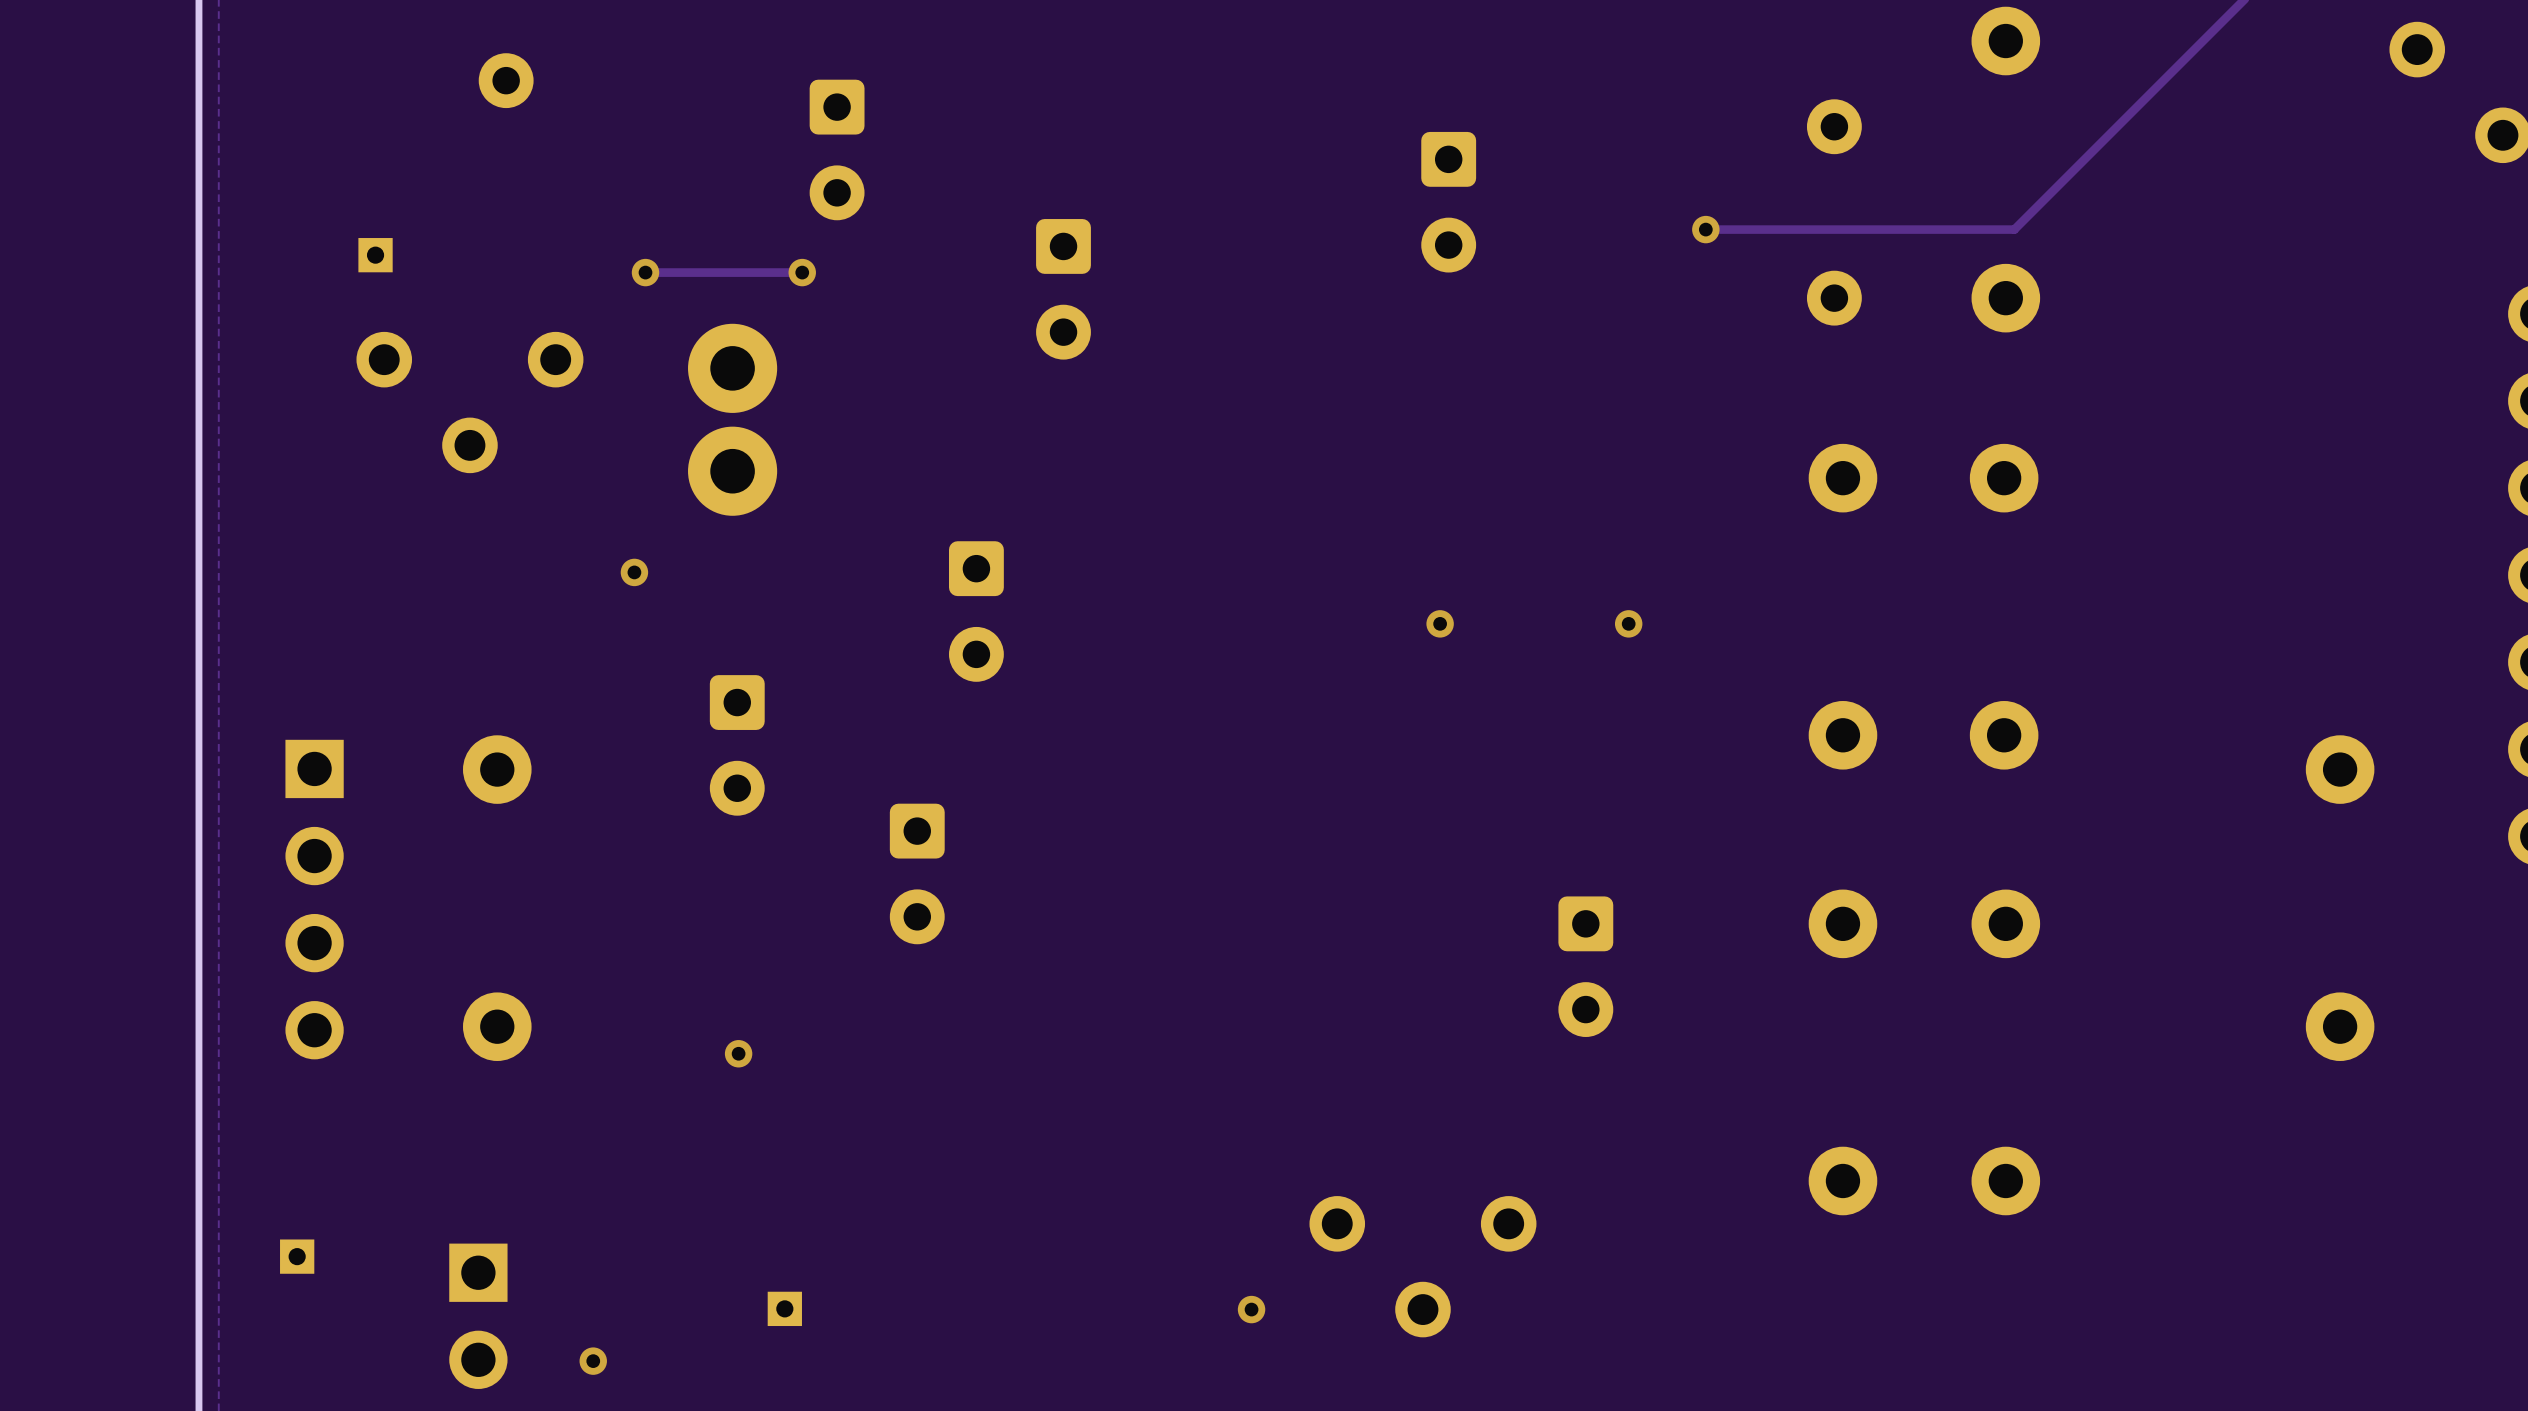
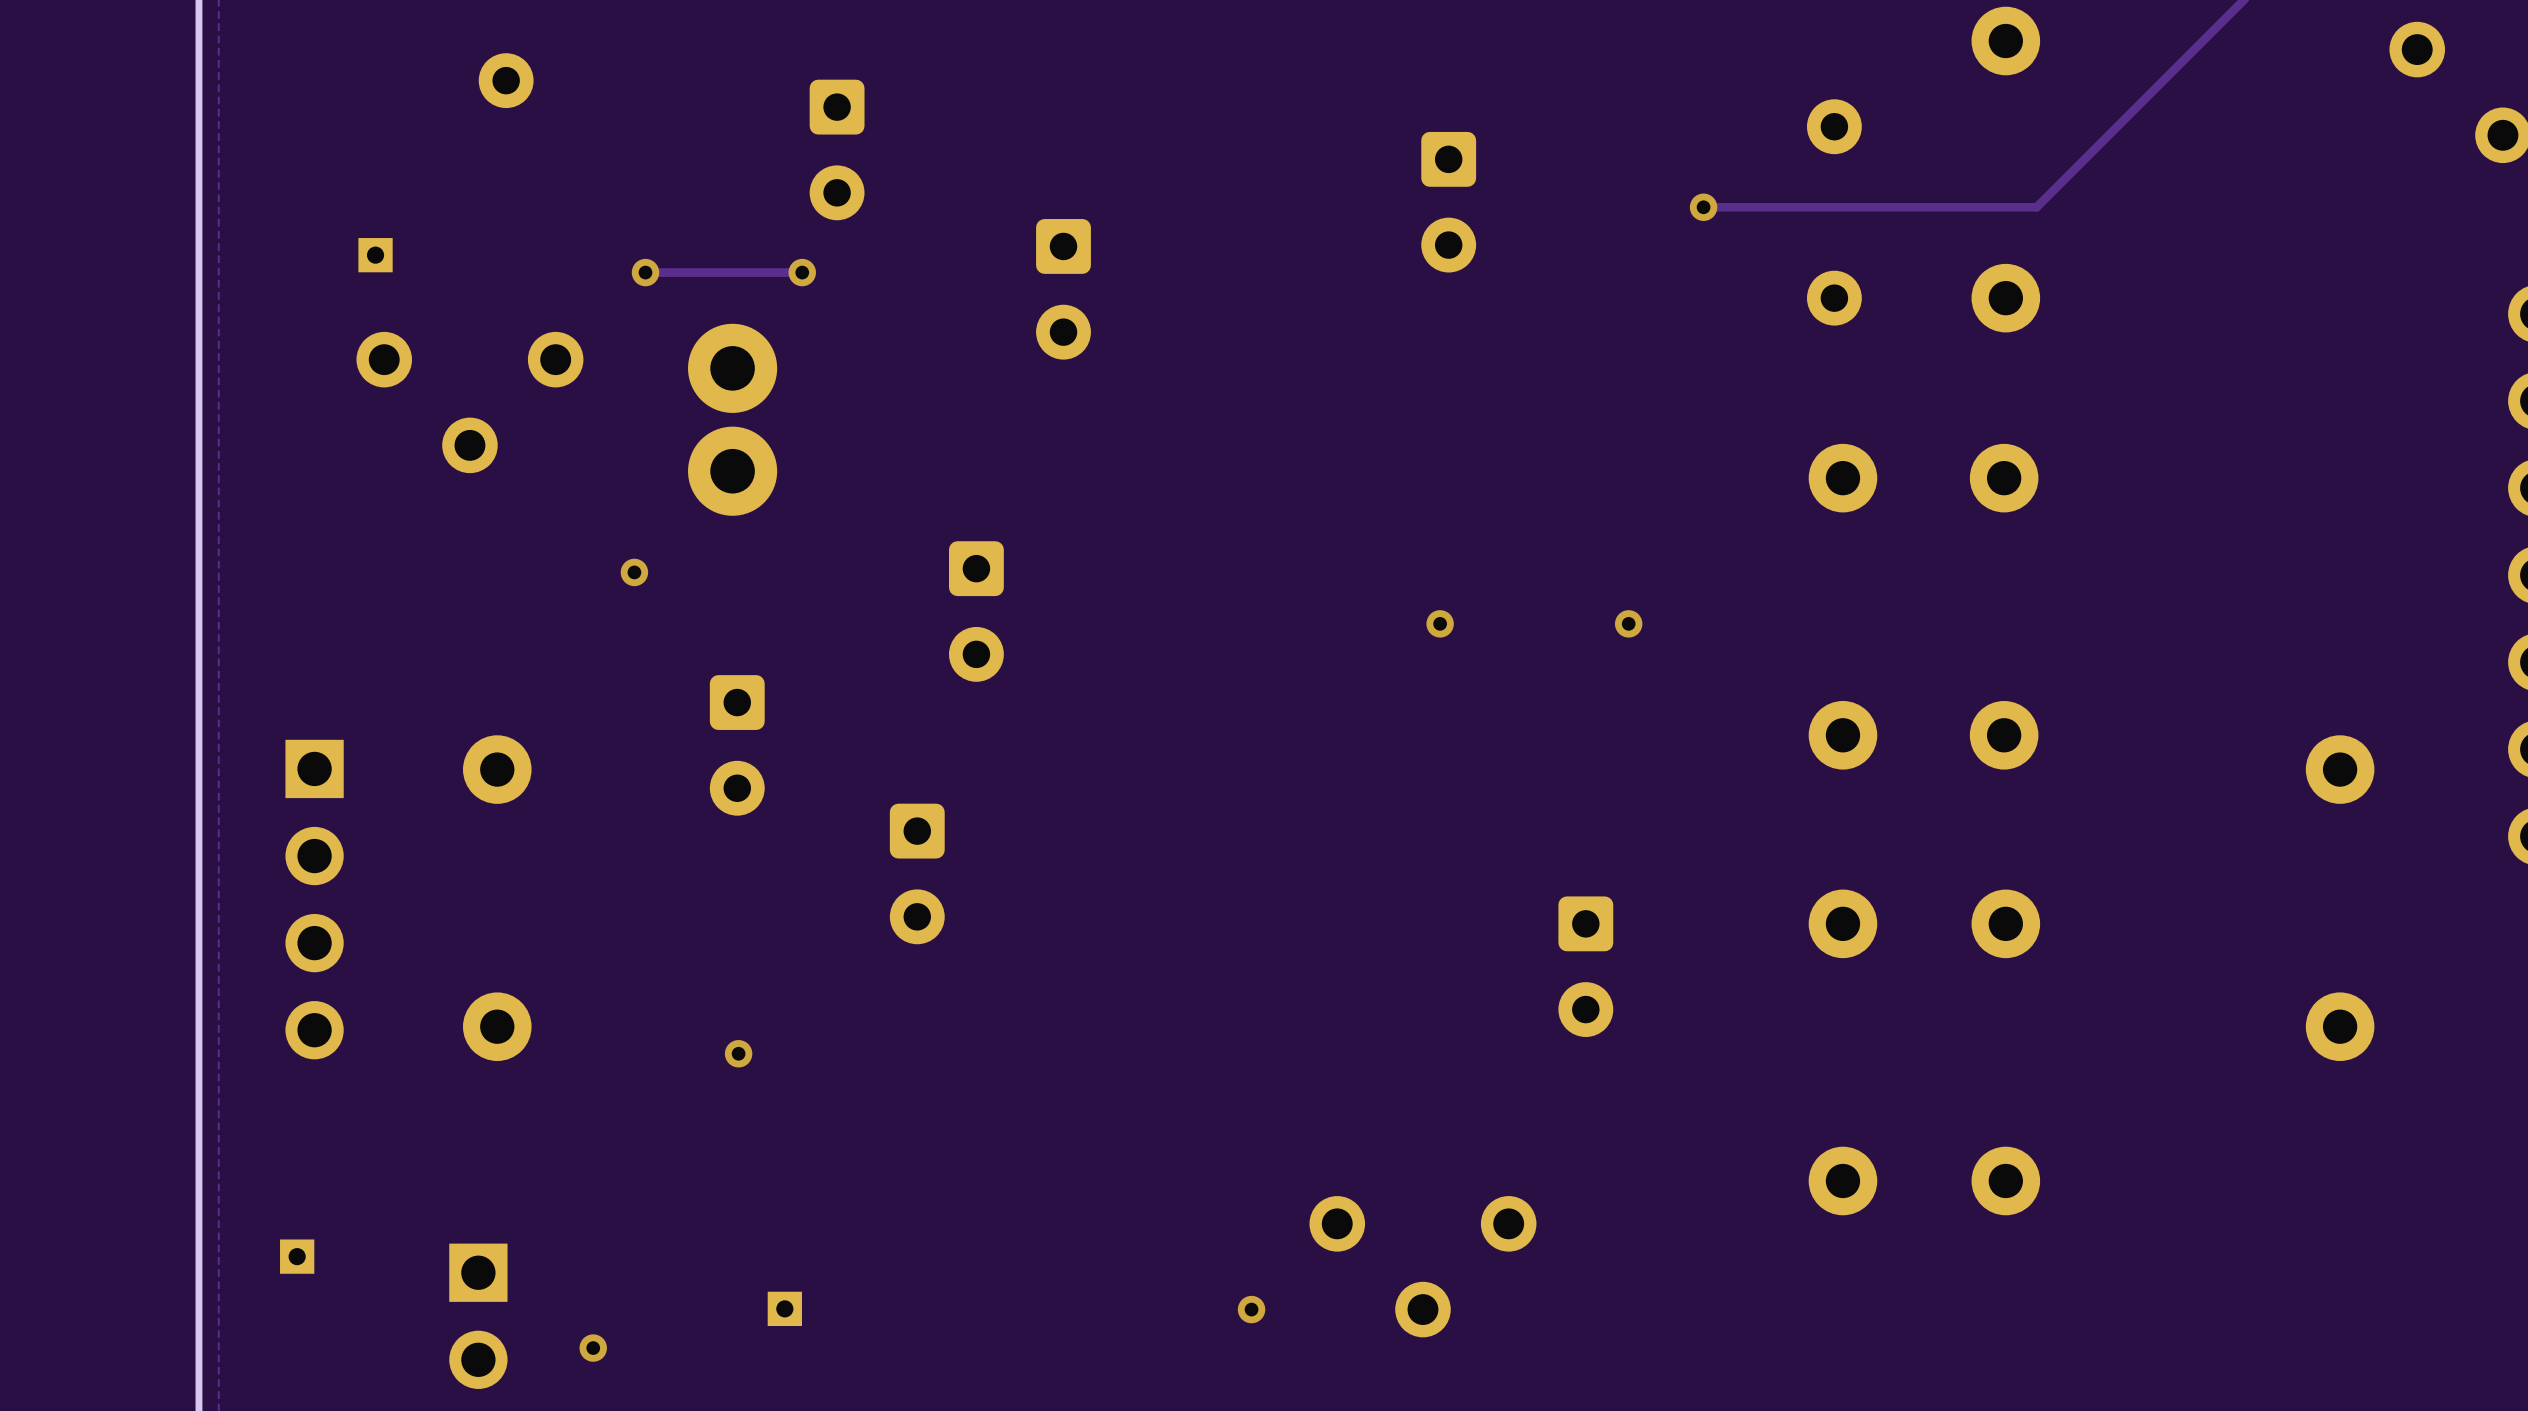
track: (2036, 207) (2014, 229) (1705, 229) -> (2036, 207) (1703, 207)
via position: (1705, 229) -> (1703, 207)
via position: (593, 1361) -> (593, 1348)

